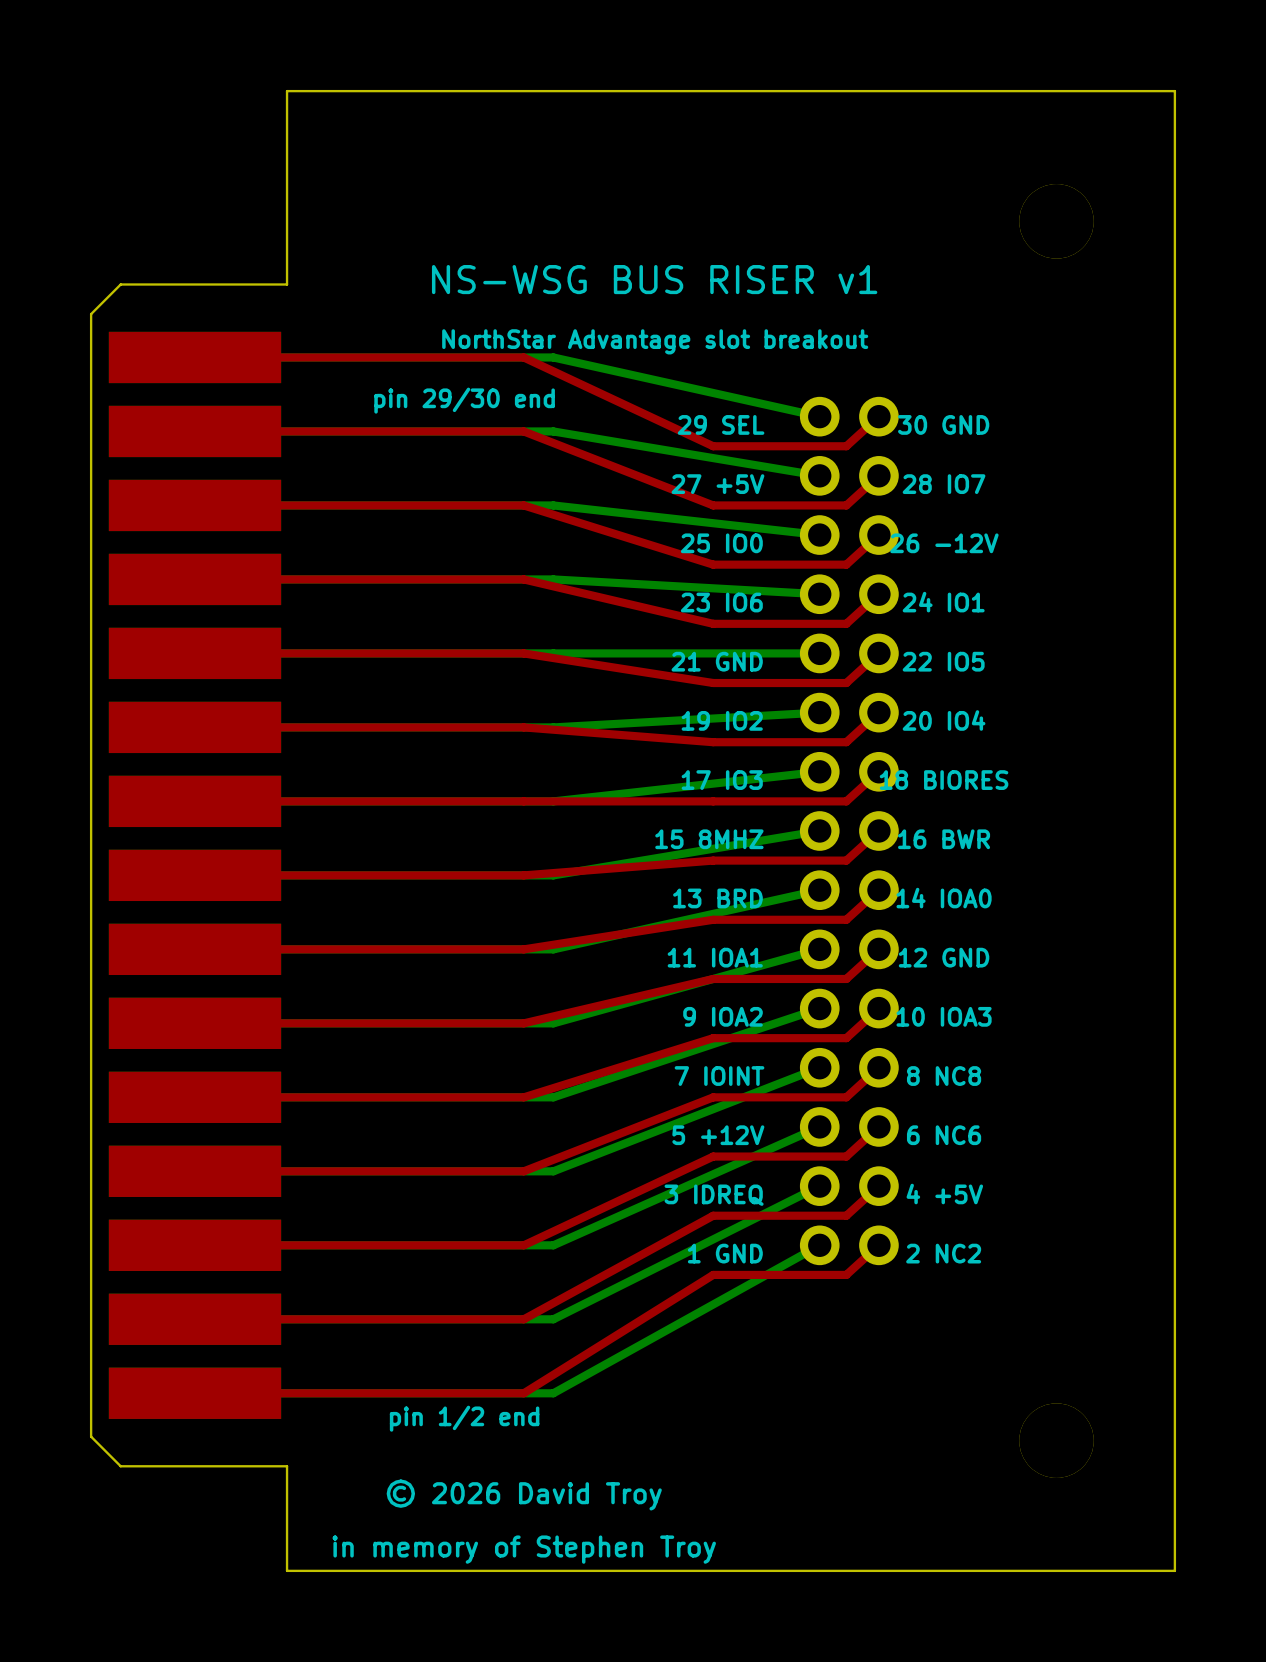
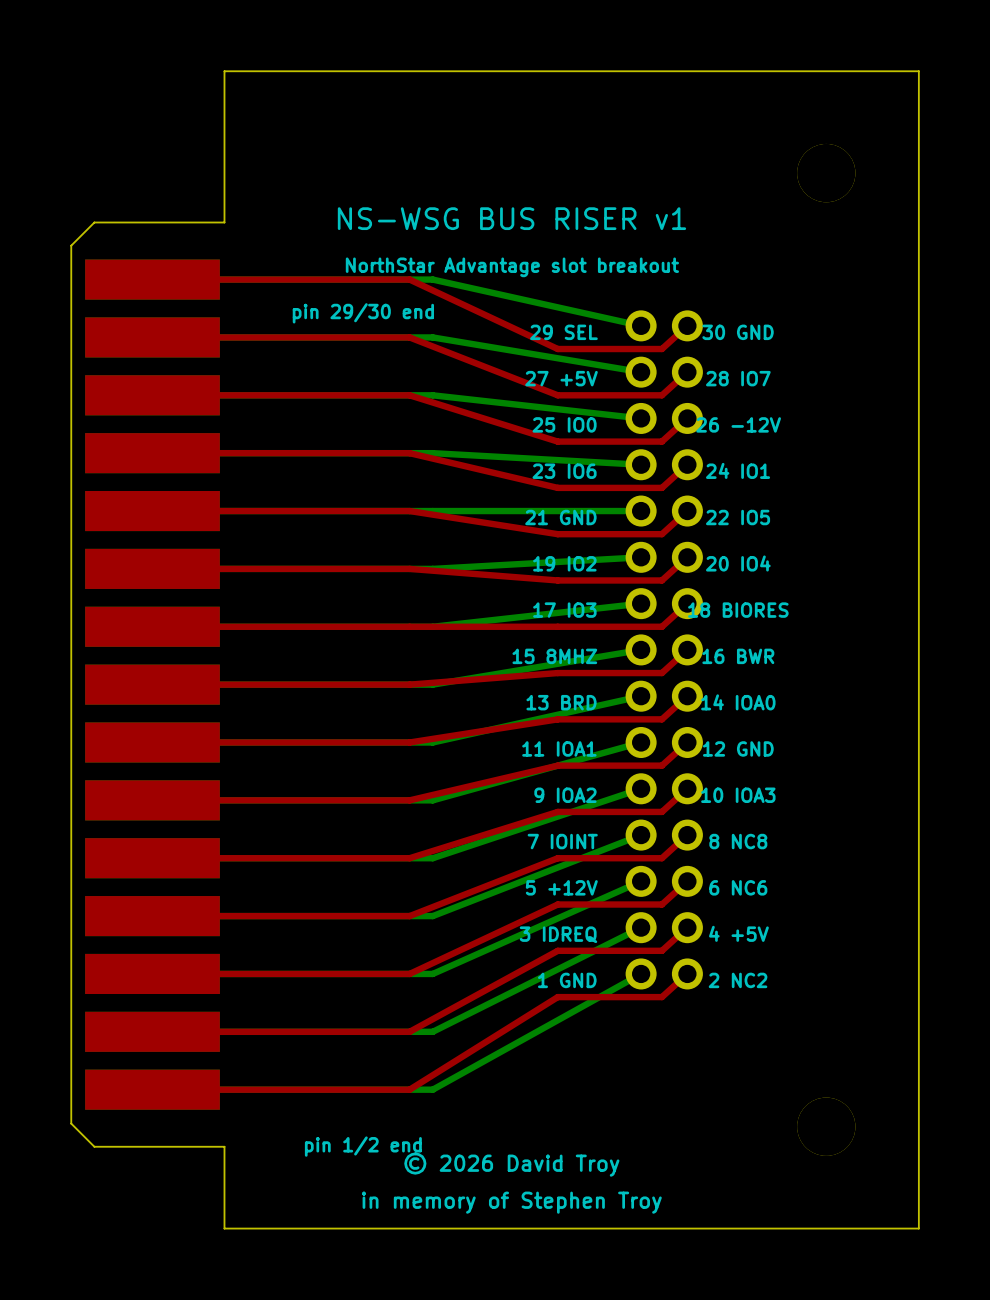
text position: pin 1/2 end (464, 1418) -> pin 1/2 end (363, 1146)
text position: © 2026 David Troy (524, 1495) -> © 2026 David Troy (511, 1164)
text position: in memory of Stephen Troy (524, 1549) -> in memory of Stephen Troy (511, 1202)

